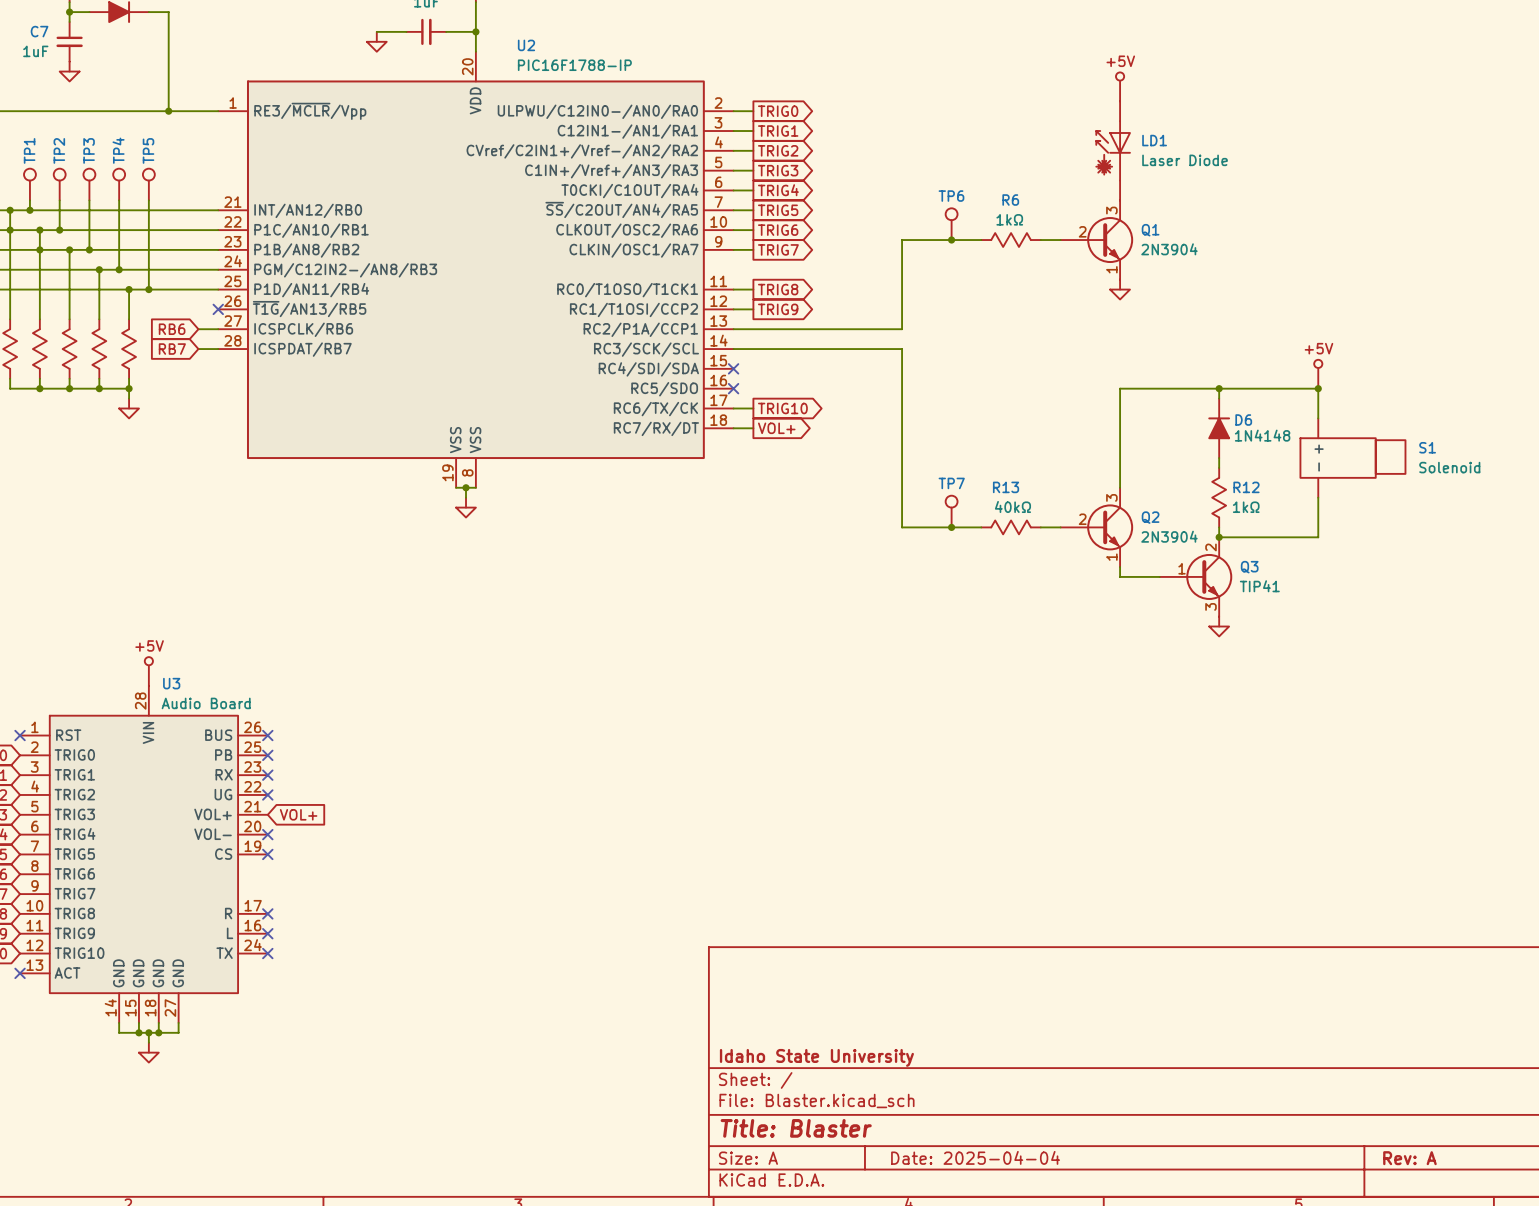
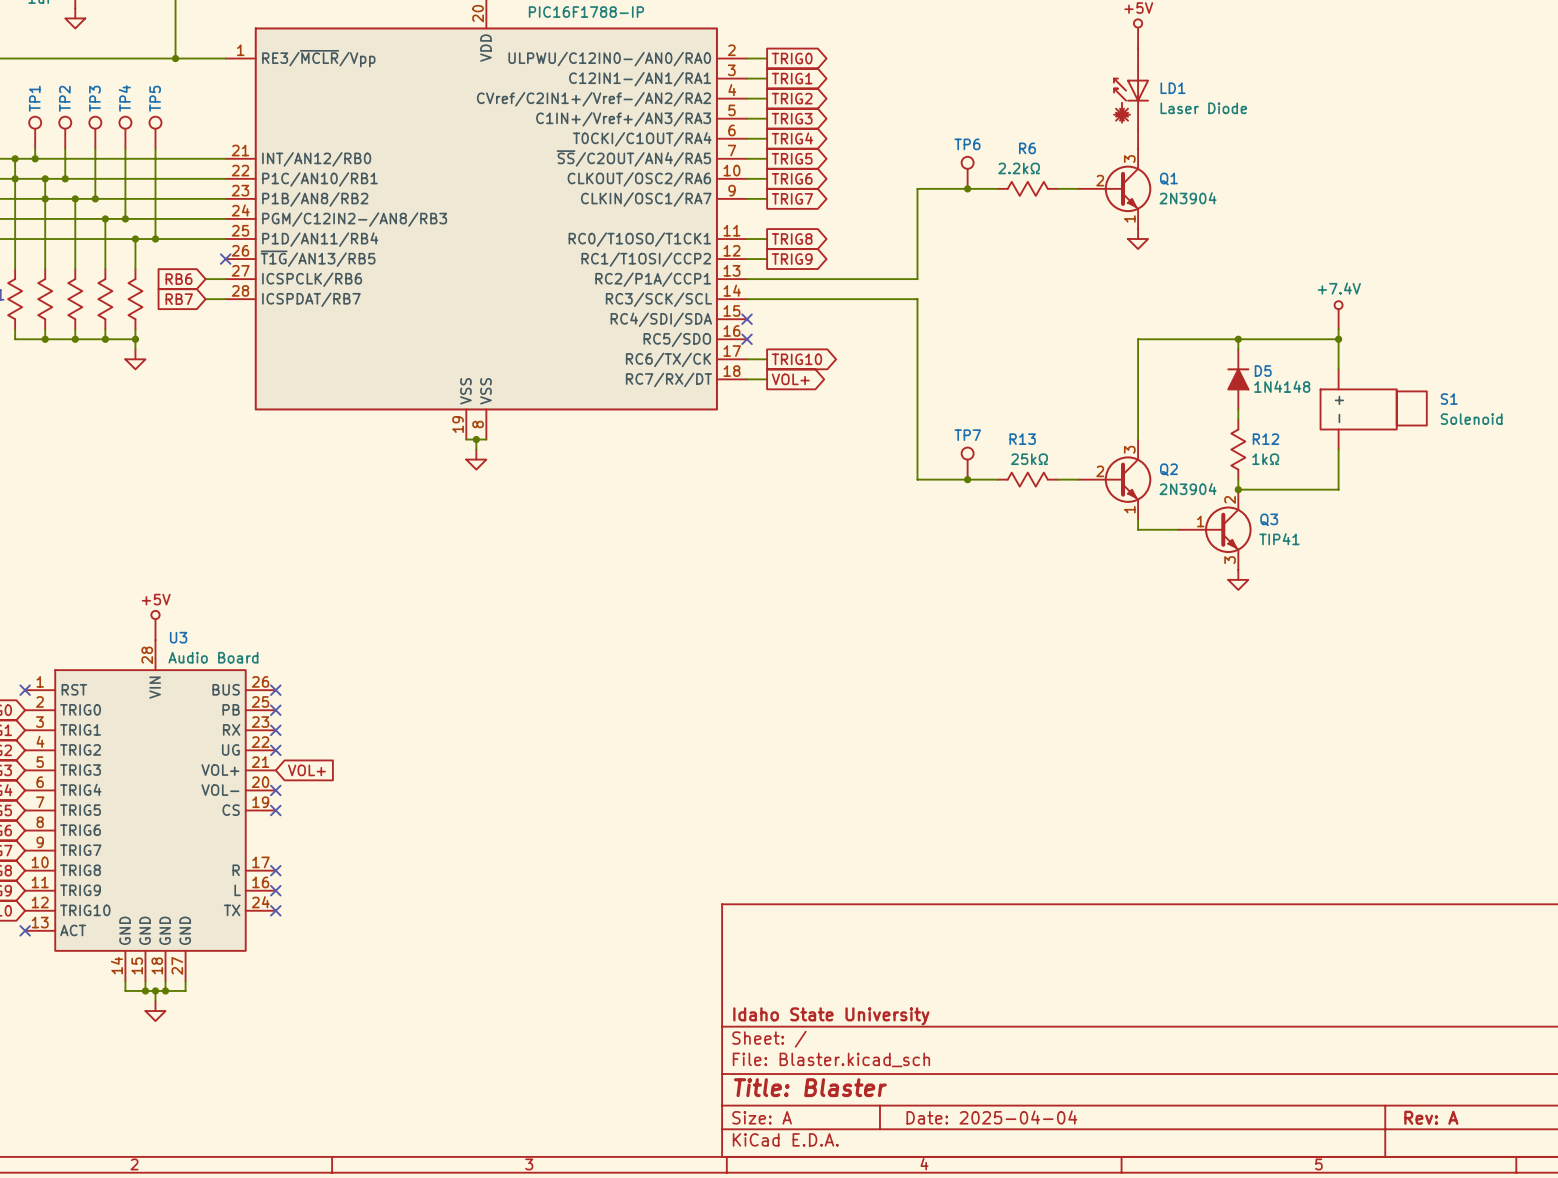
R6 value: 1kΩ (1009, 219) -> 2.2kΩ (1019, 168)
power symbol: none -> +7.4V (1338, 315)
power symbol: (1318, 374) -> none
D6 name: D6 (1243, 420) -> D5 (1263, 370)
R13 value: 40kΩ (1012, 506) -> 25kΩ (1029, 459)

